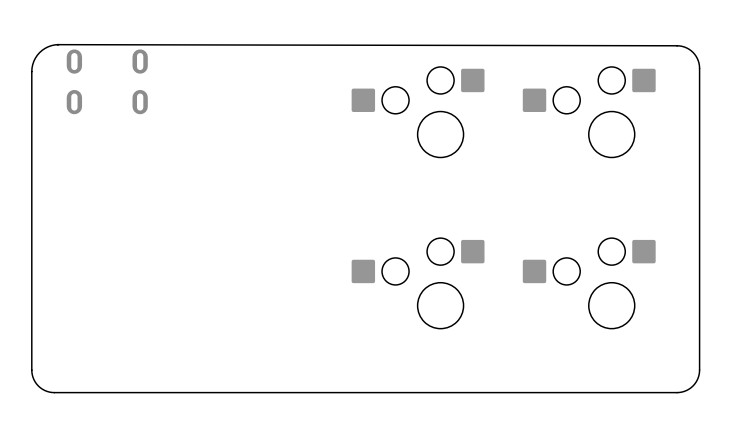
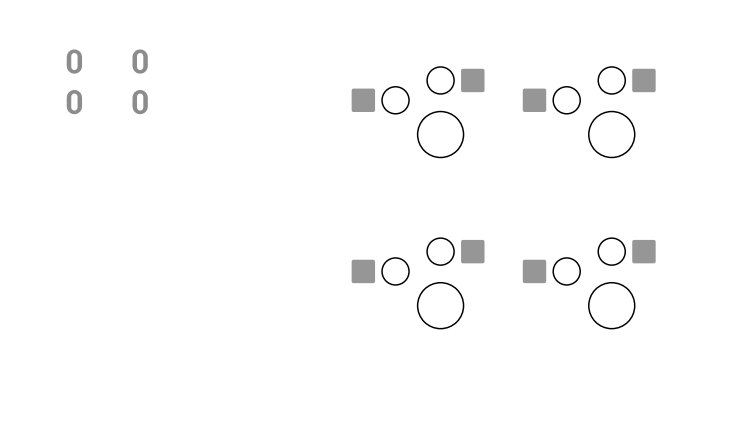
board edge: (58, 44) (55, 44) (48, 46) (39, 52) (33, 61) (31, 71) (31, 370) (35, 382) (44, 390) (54, 392) (677, 392) (689, 389) (697, 379) (699, 370) (699, 68) (696, 56) (686, 48) (677, 45) (57, 44) -> none

